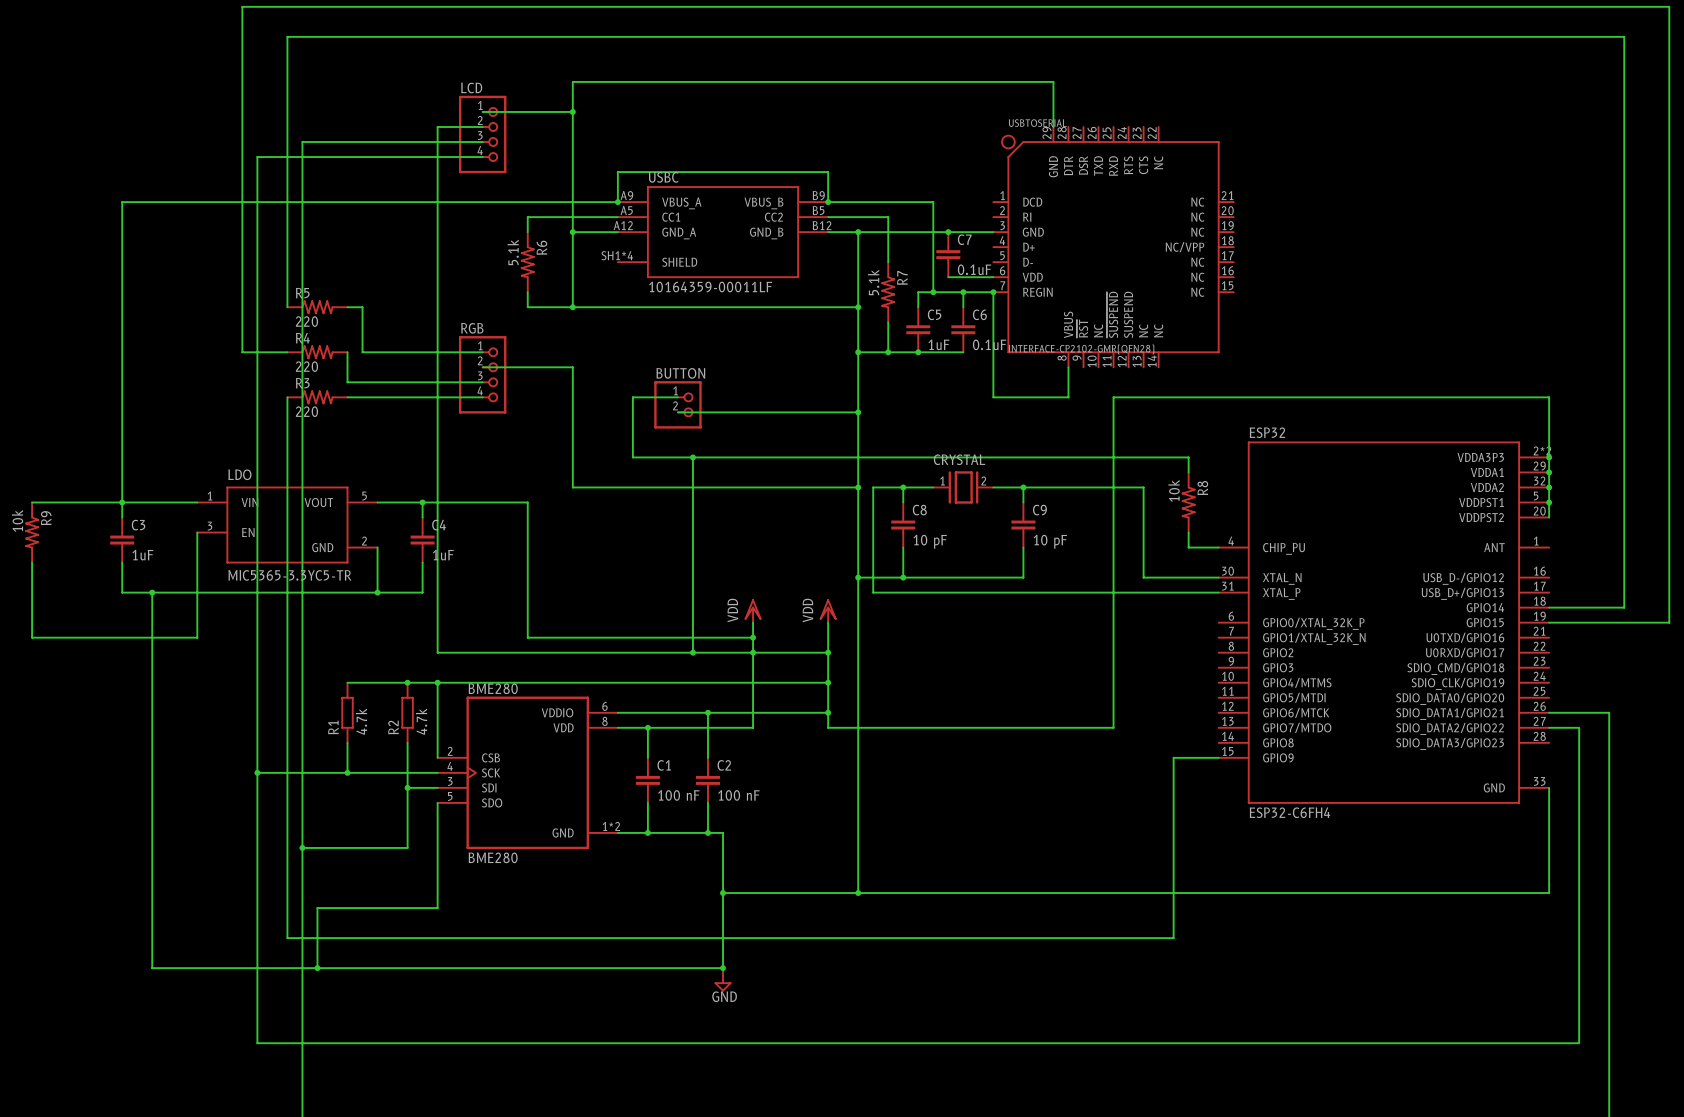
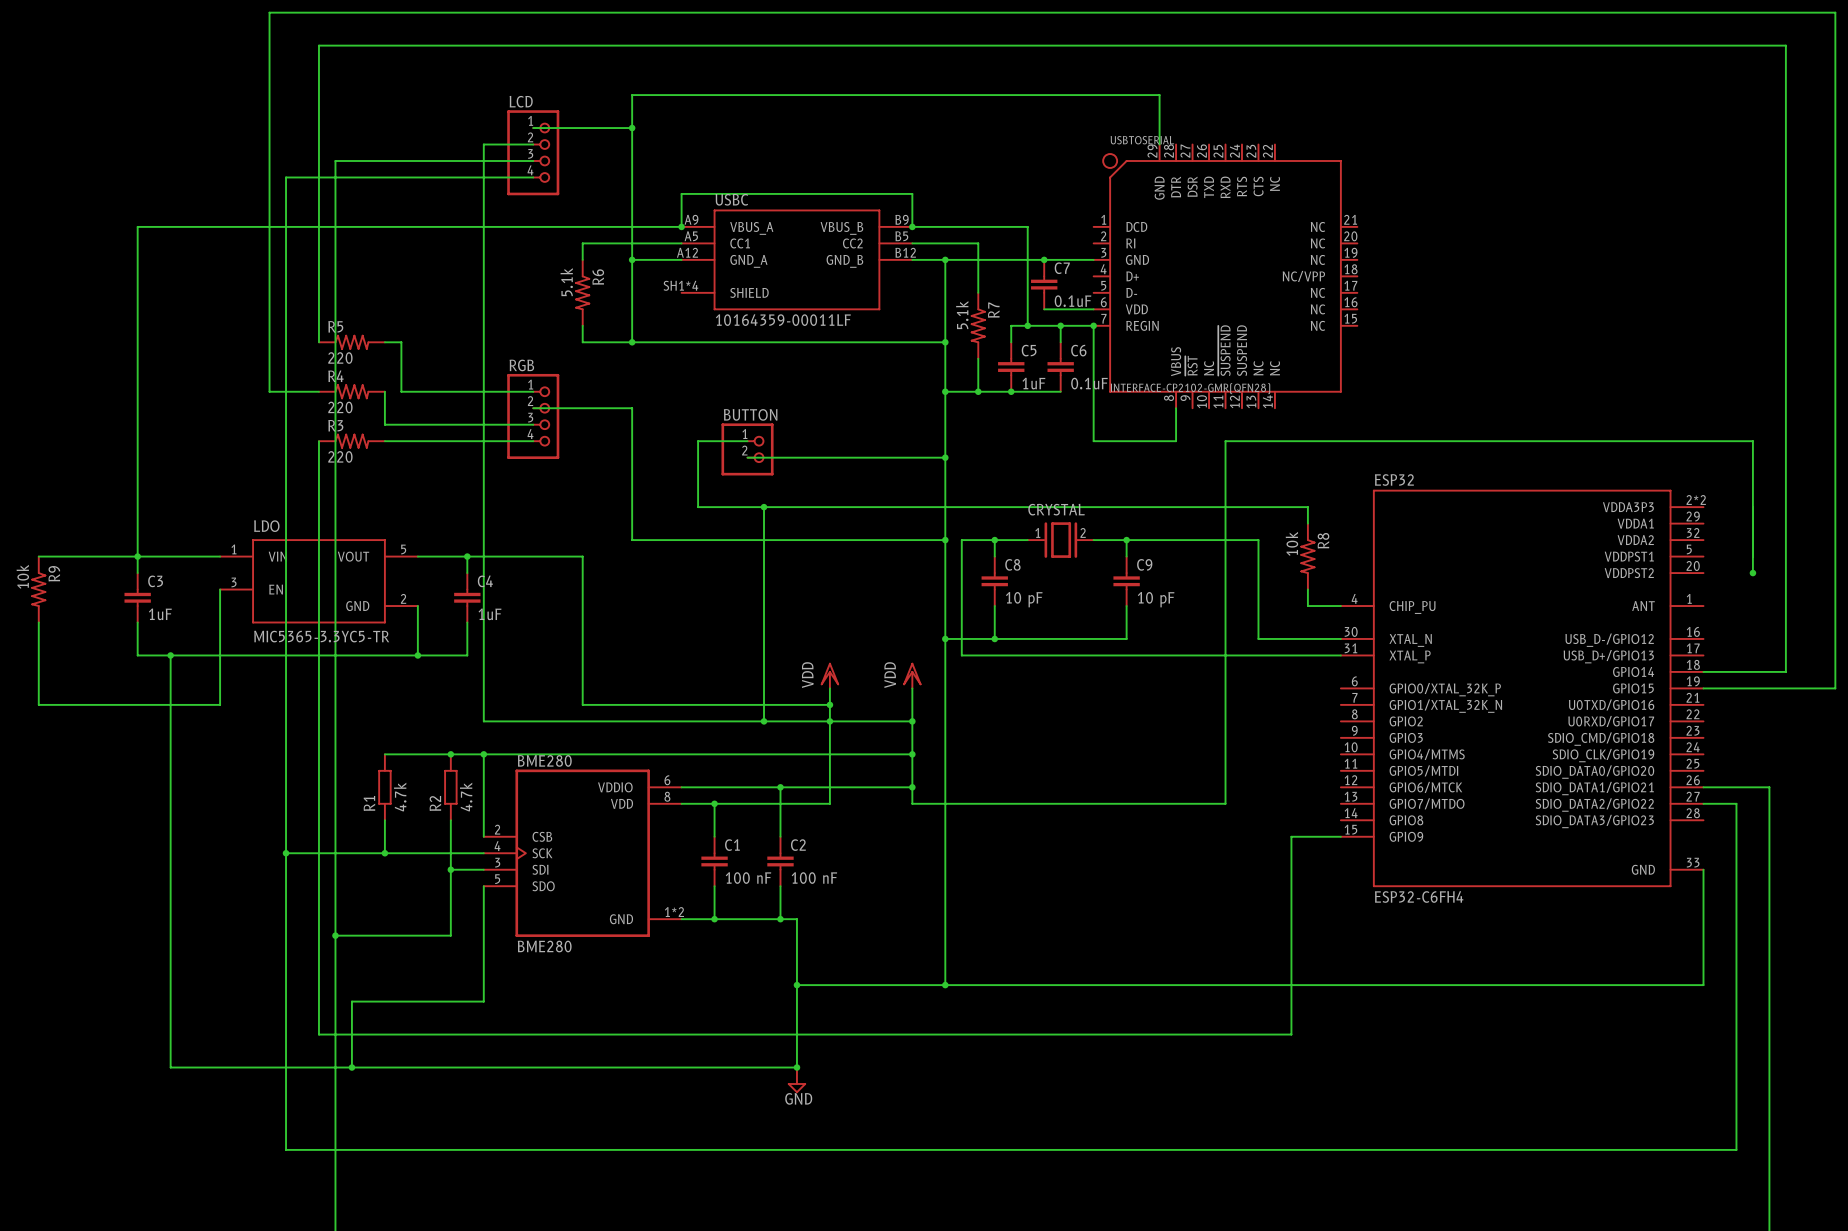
wire: (1549, 397) (1549, 517) -> (1703, 441) (1752, 441) (1752, 573)
junction: (1549, 457) -> none
junction: (1549, 472) -> none
junction: (1549, 487) -> none
junction: (1549, 502) -> none
junction: none -> (1752, 573)

